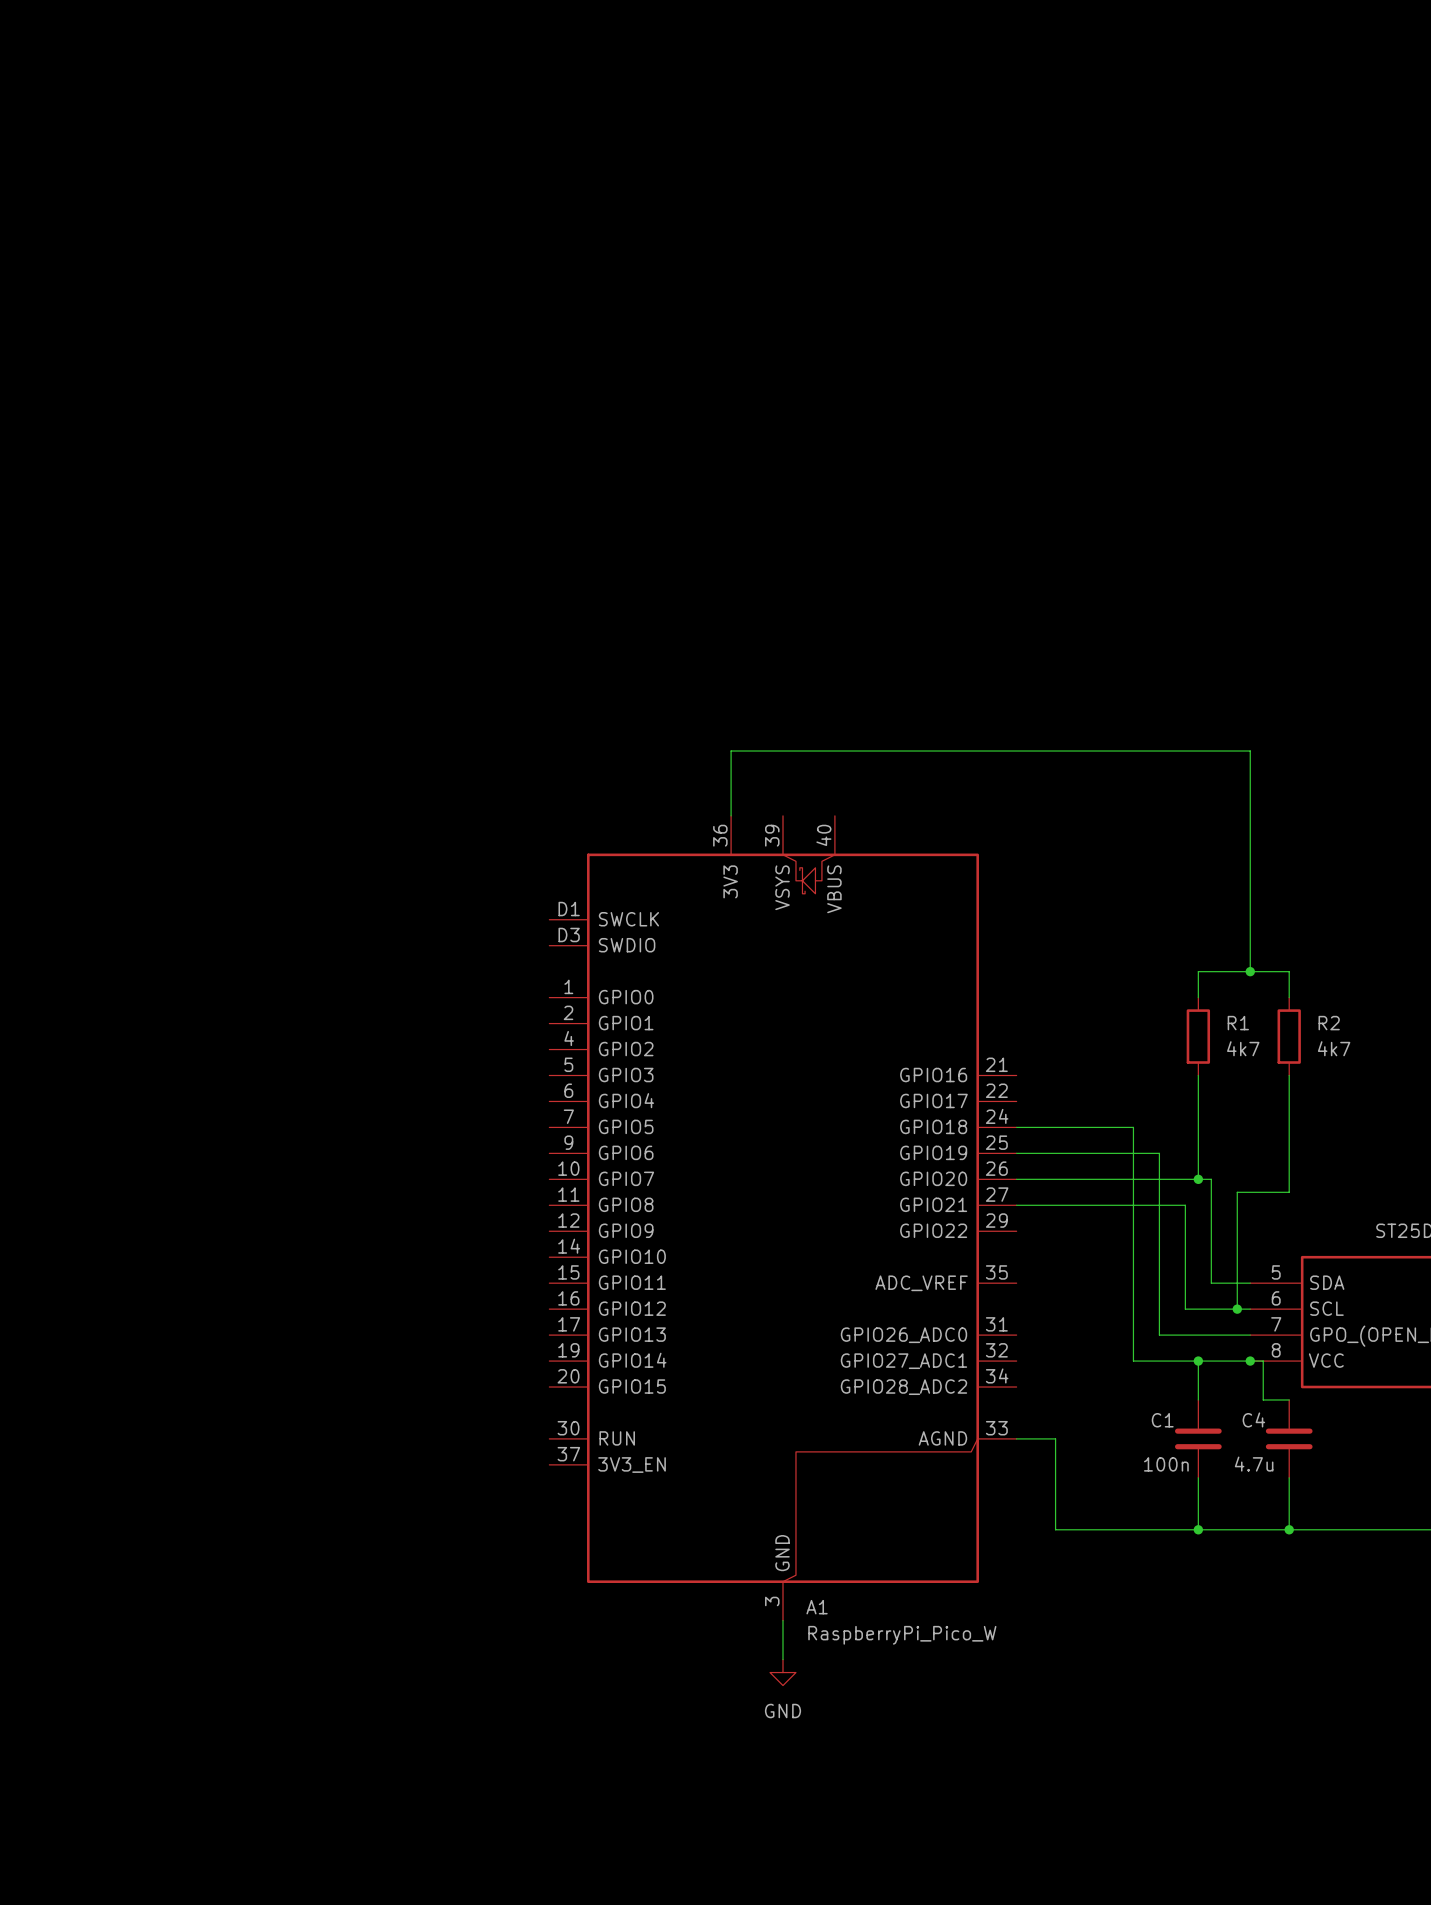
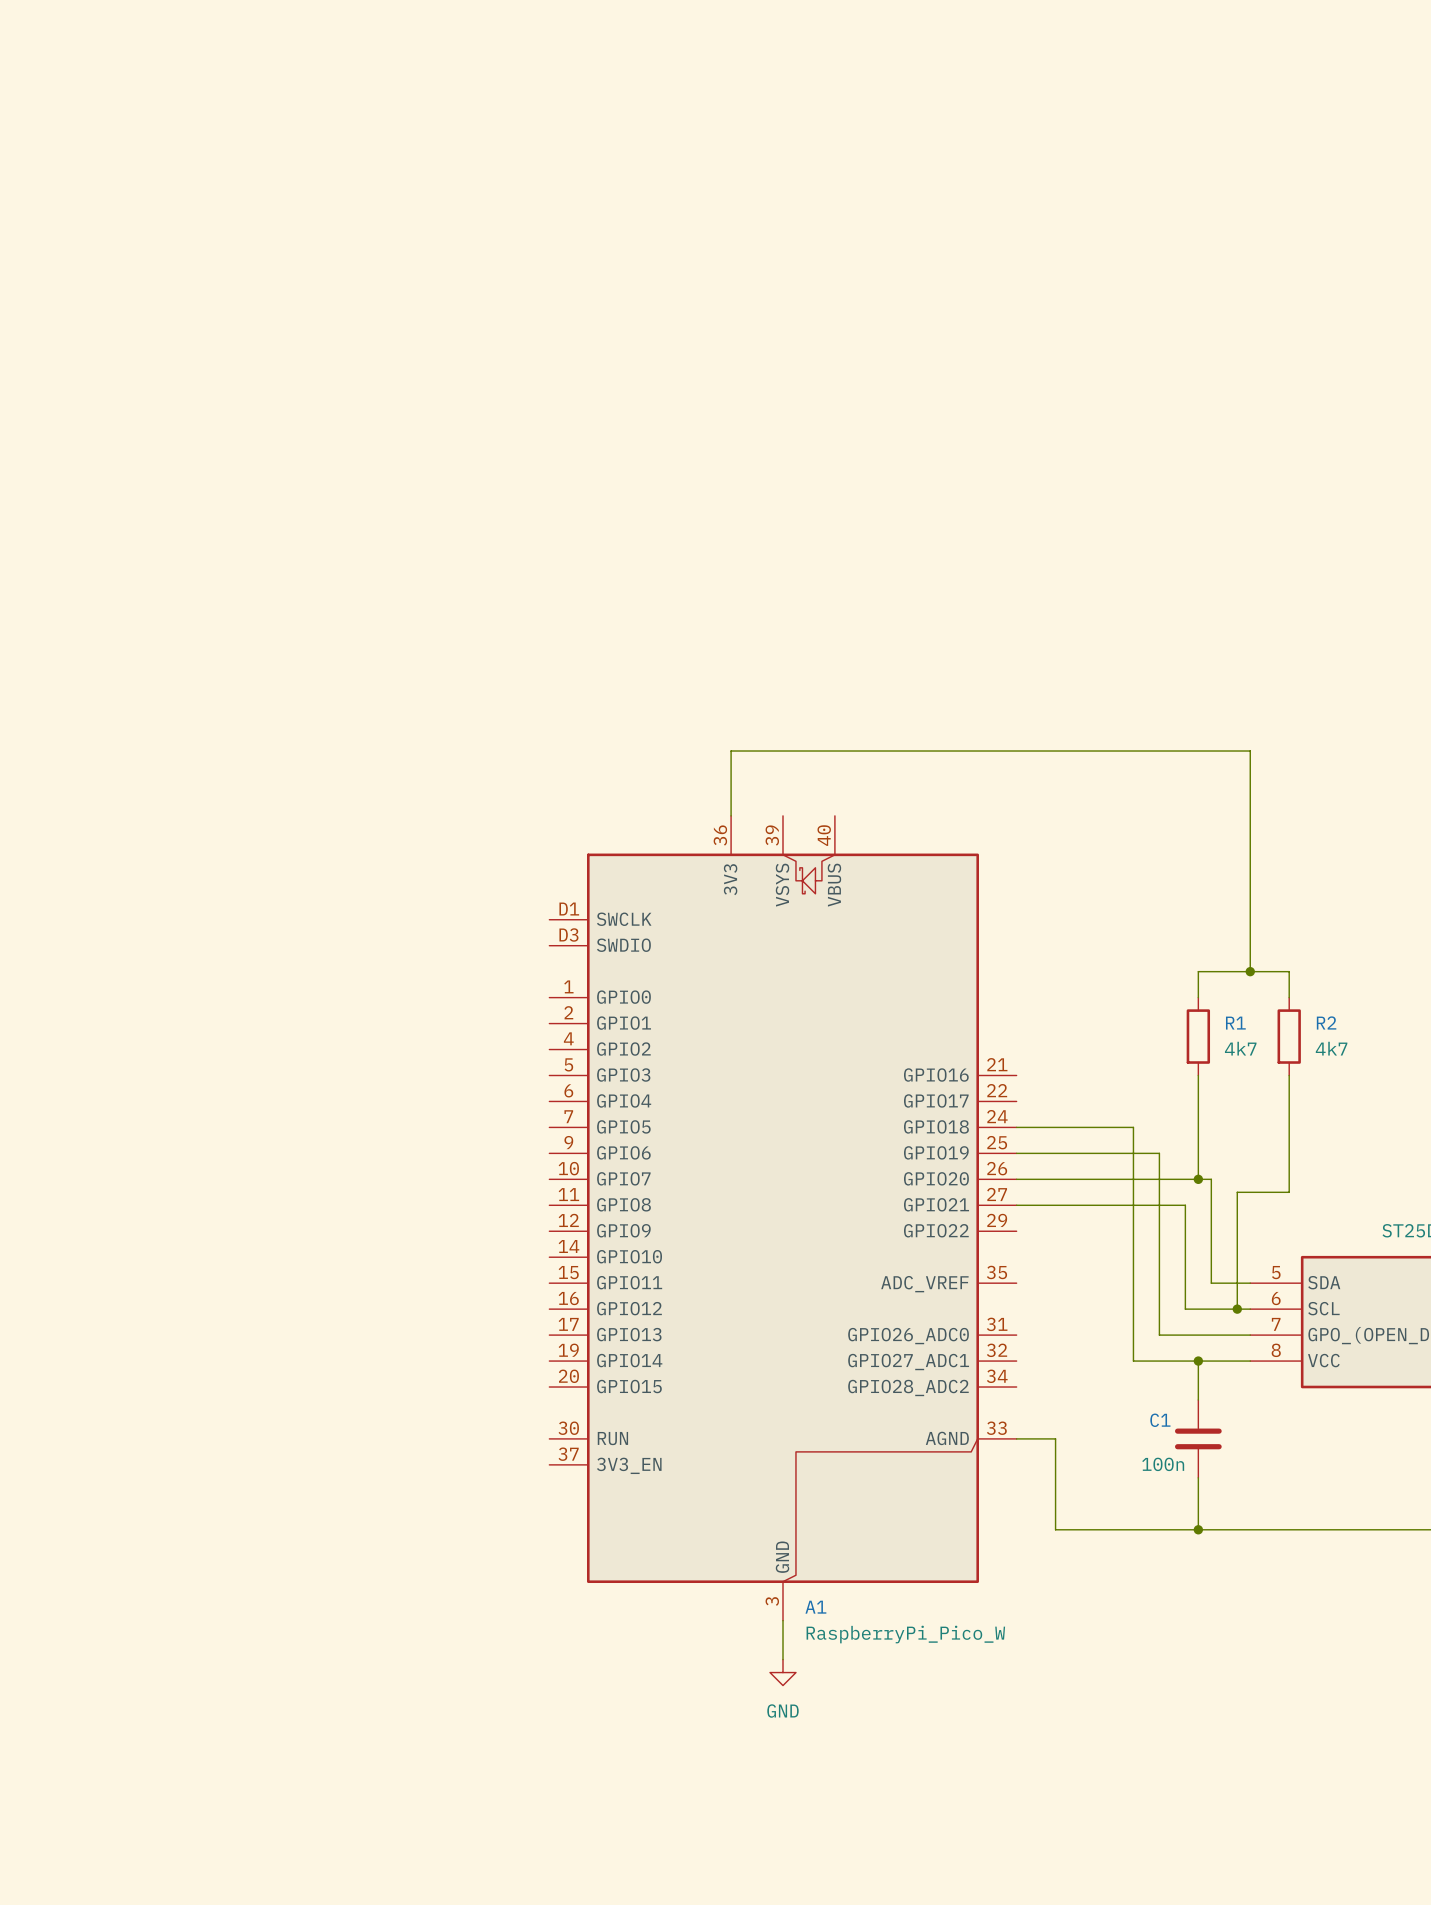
wire: (1250, 1361) (1263, 1361) (1263, 1399) (1289, 1399) -> none
junction: (1250, 1361) -> none
C4: 4.7u (1289, 1438) -> none
wire: (1289, 1477) (1289, 1529) -> none
junction: (1289, 1529) -> none

